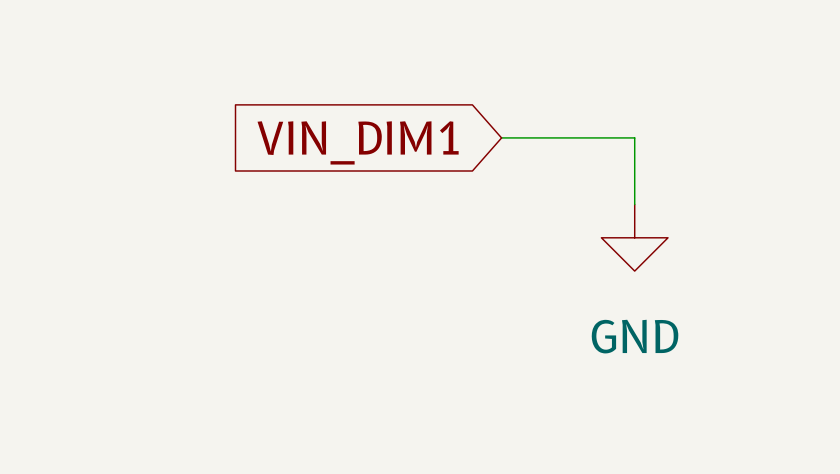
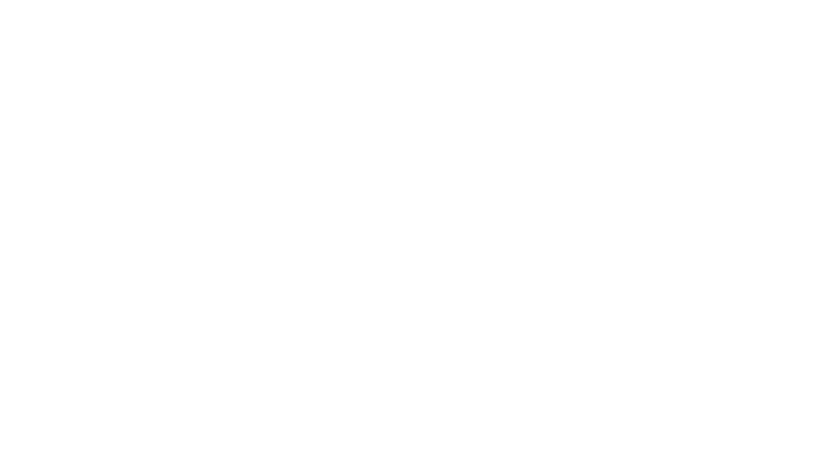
wire: (501, 137) (634, 137) (634, 204) -> none
global label: VIN_DIM1 (358, 142) -> none
power symbol: GND (634, 237) -> none

